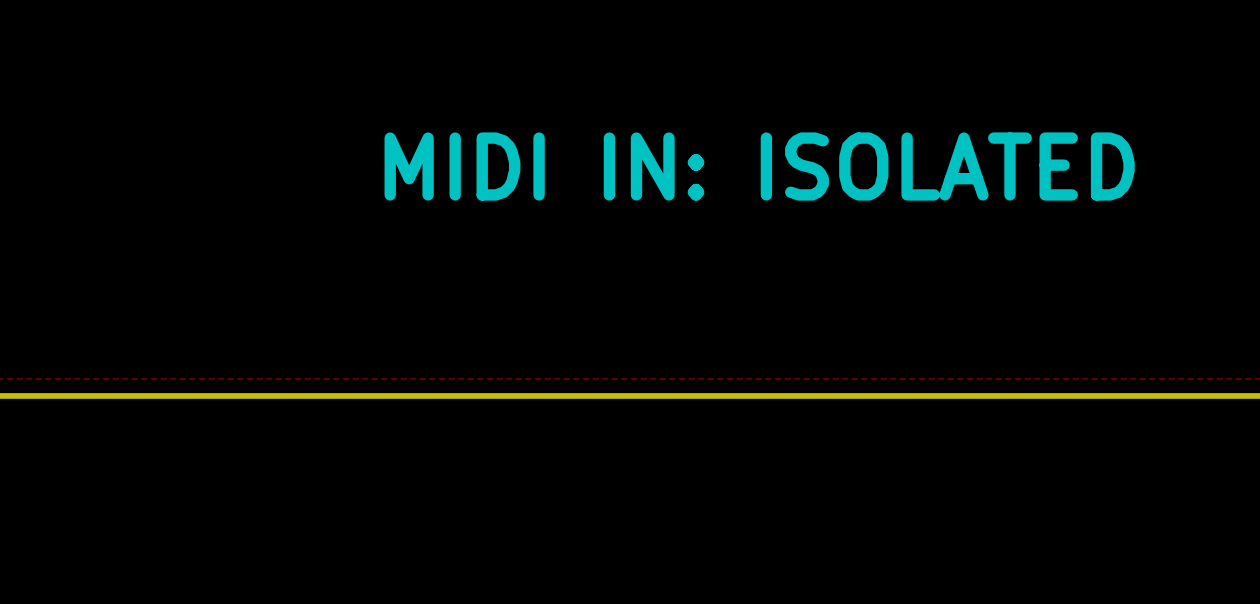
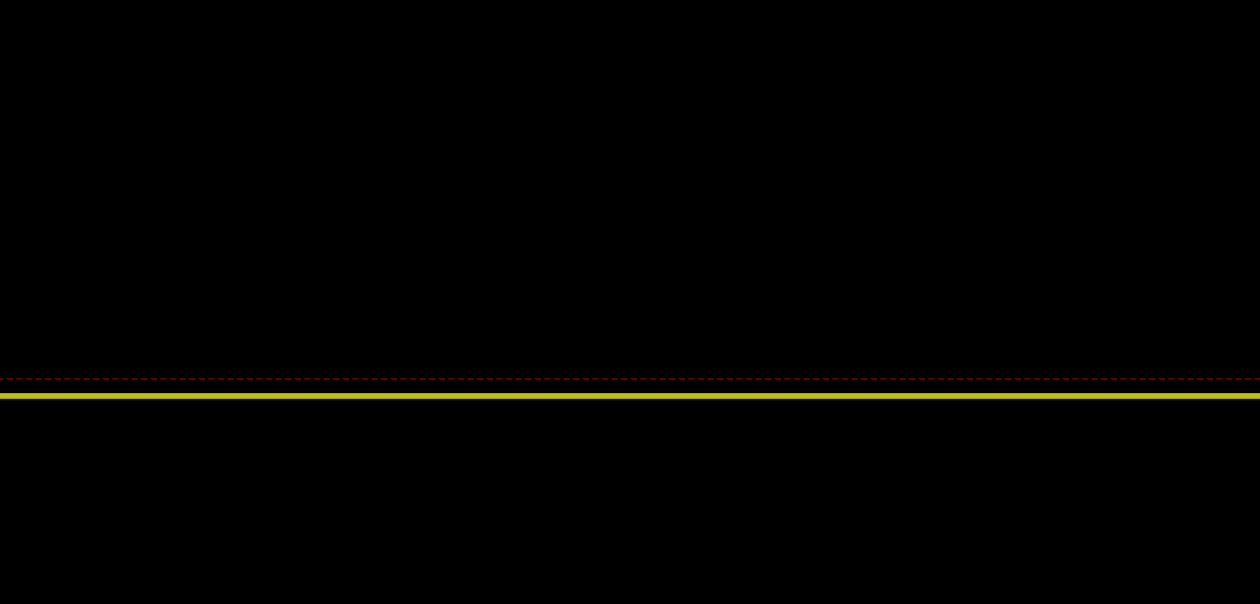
text: MIDI IN: ISOLATED (759, 166) -> none

